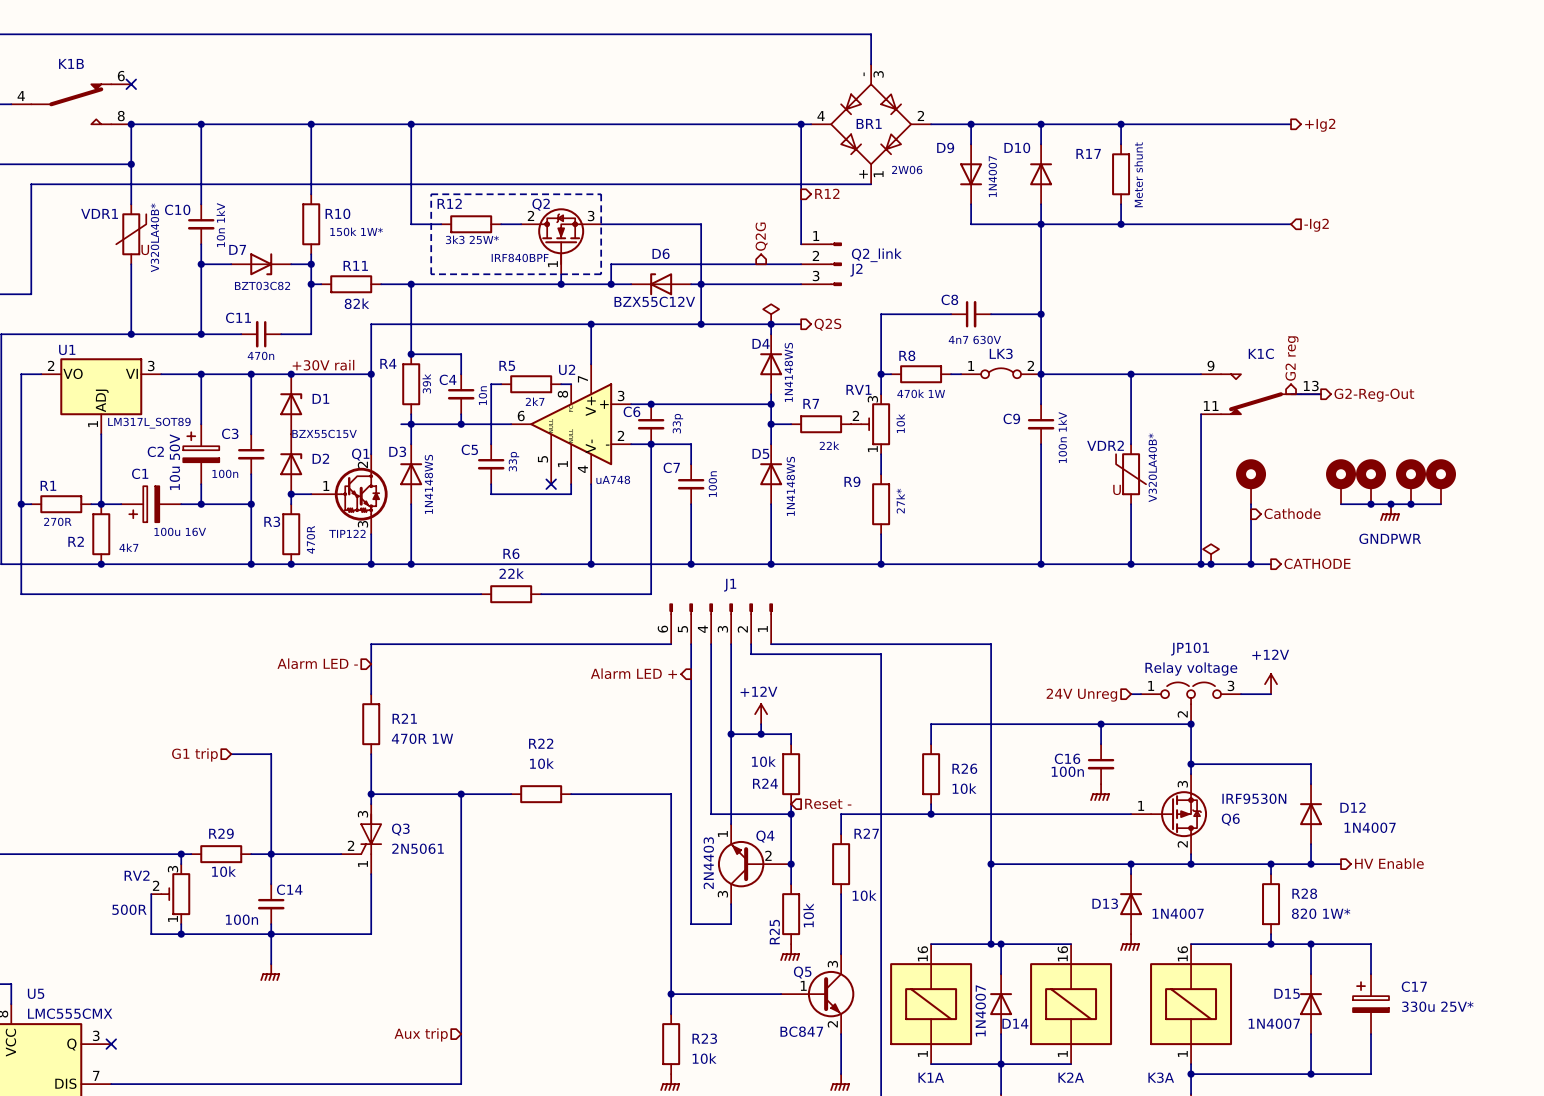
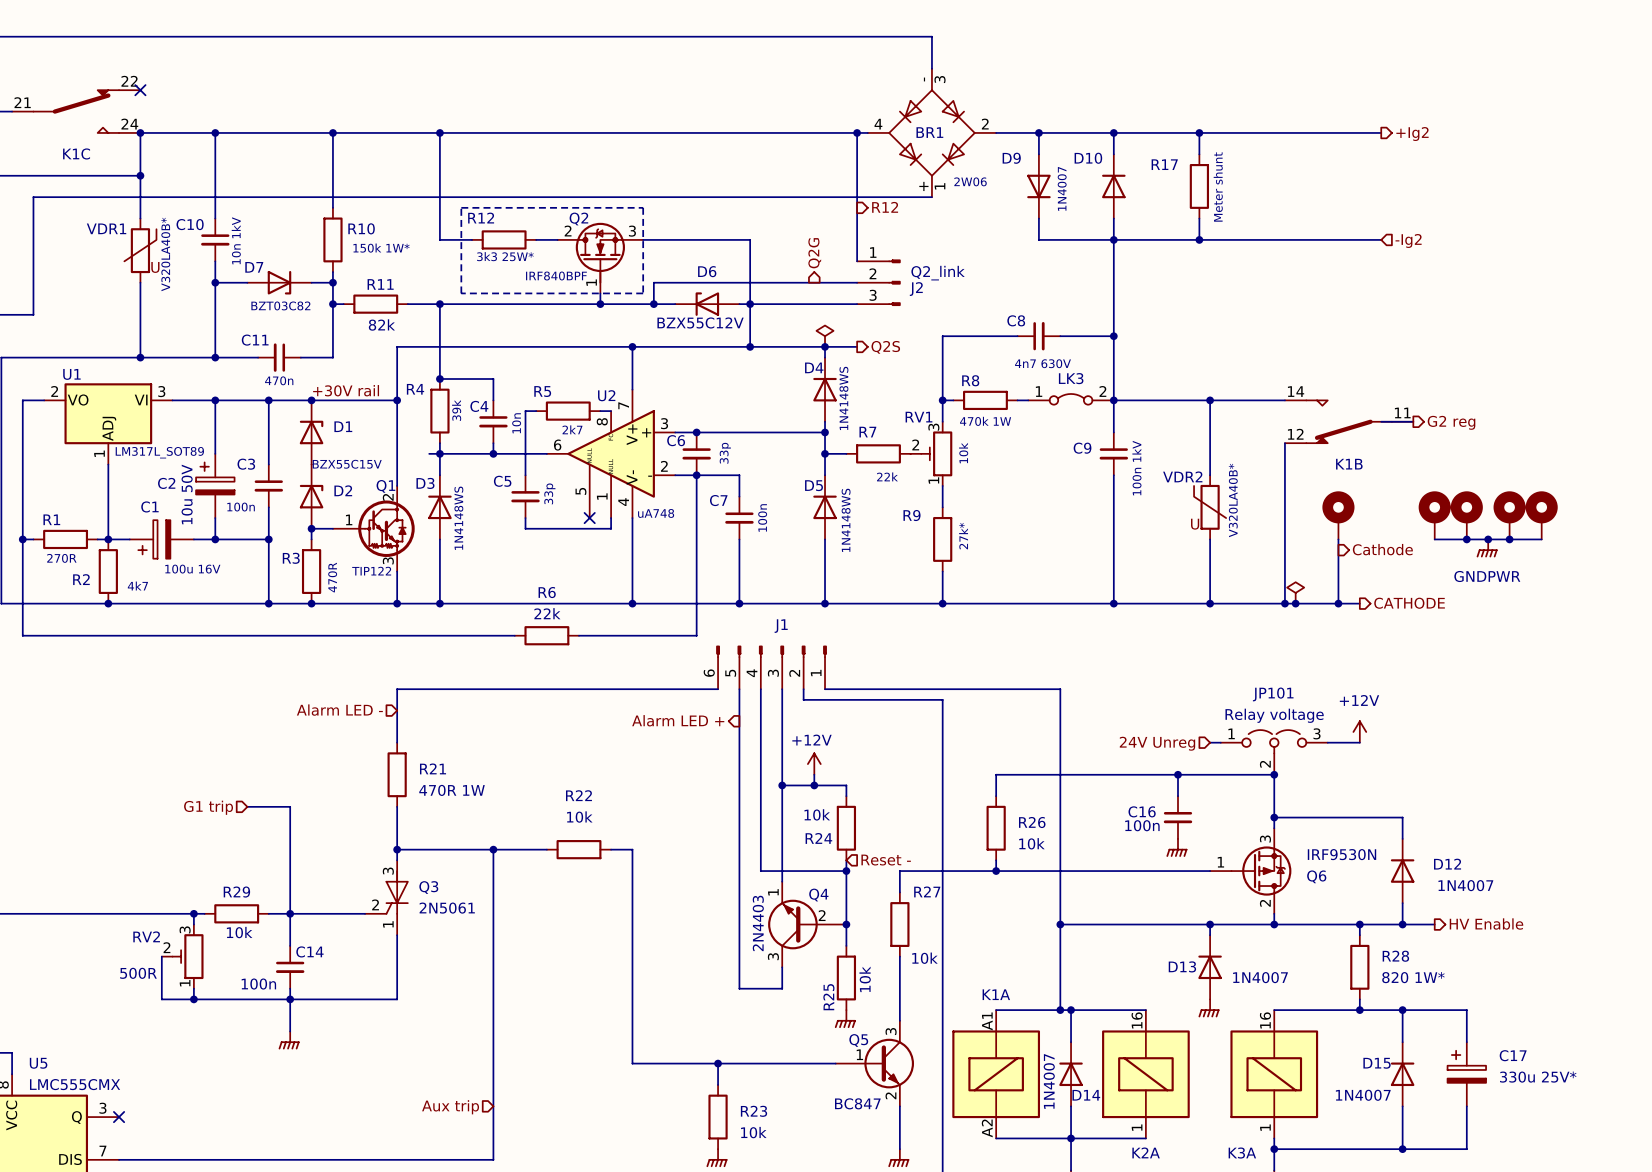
K1B name position: K1B (71, 63) -> K1B (1349, 464)
K1B symbol: [11, 84, 132, 125] -> [1284, 400, 1414, 444]
K1C name position: K1C (1261, 353) -> K1C (76, 153)
hierarchical label: G2 reg (1291, 358) -> none
K1C symbol: [1201, 374, 1322, 415] -> [12, 90, 141, 133]
hierarchical label: G2-Reg-Out (1374, 395) -> G2 reg (1451, 422)
wire: (591, 794) (671, 794) (671, 994) -> (632, 849) (632, 1063) (718, 1063)
K1A symbol: [890, 944, 973, 1065] -> [952, 1010, 1041, 1139]
K1A name position: K1A (931, 1077) -> K1A (996, 994)

